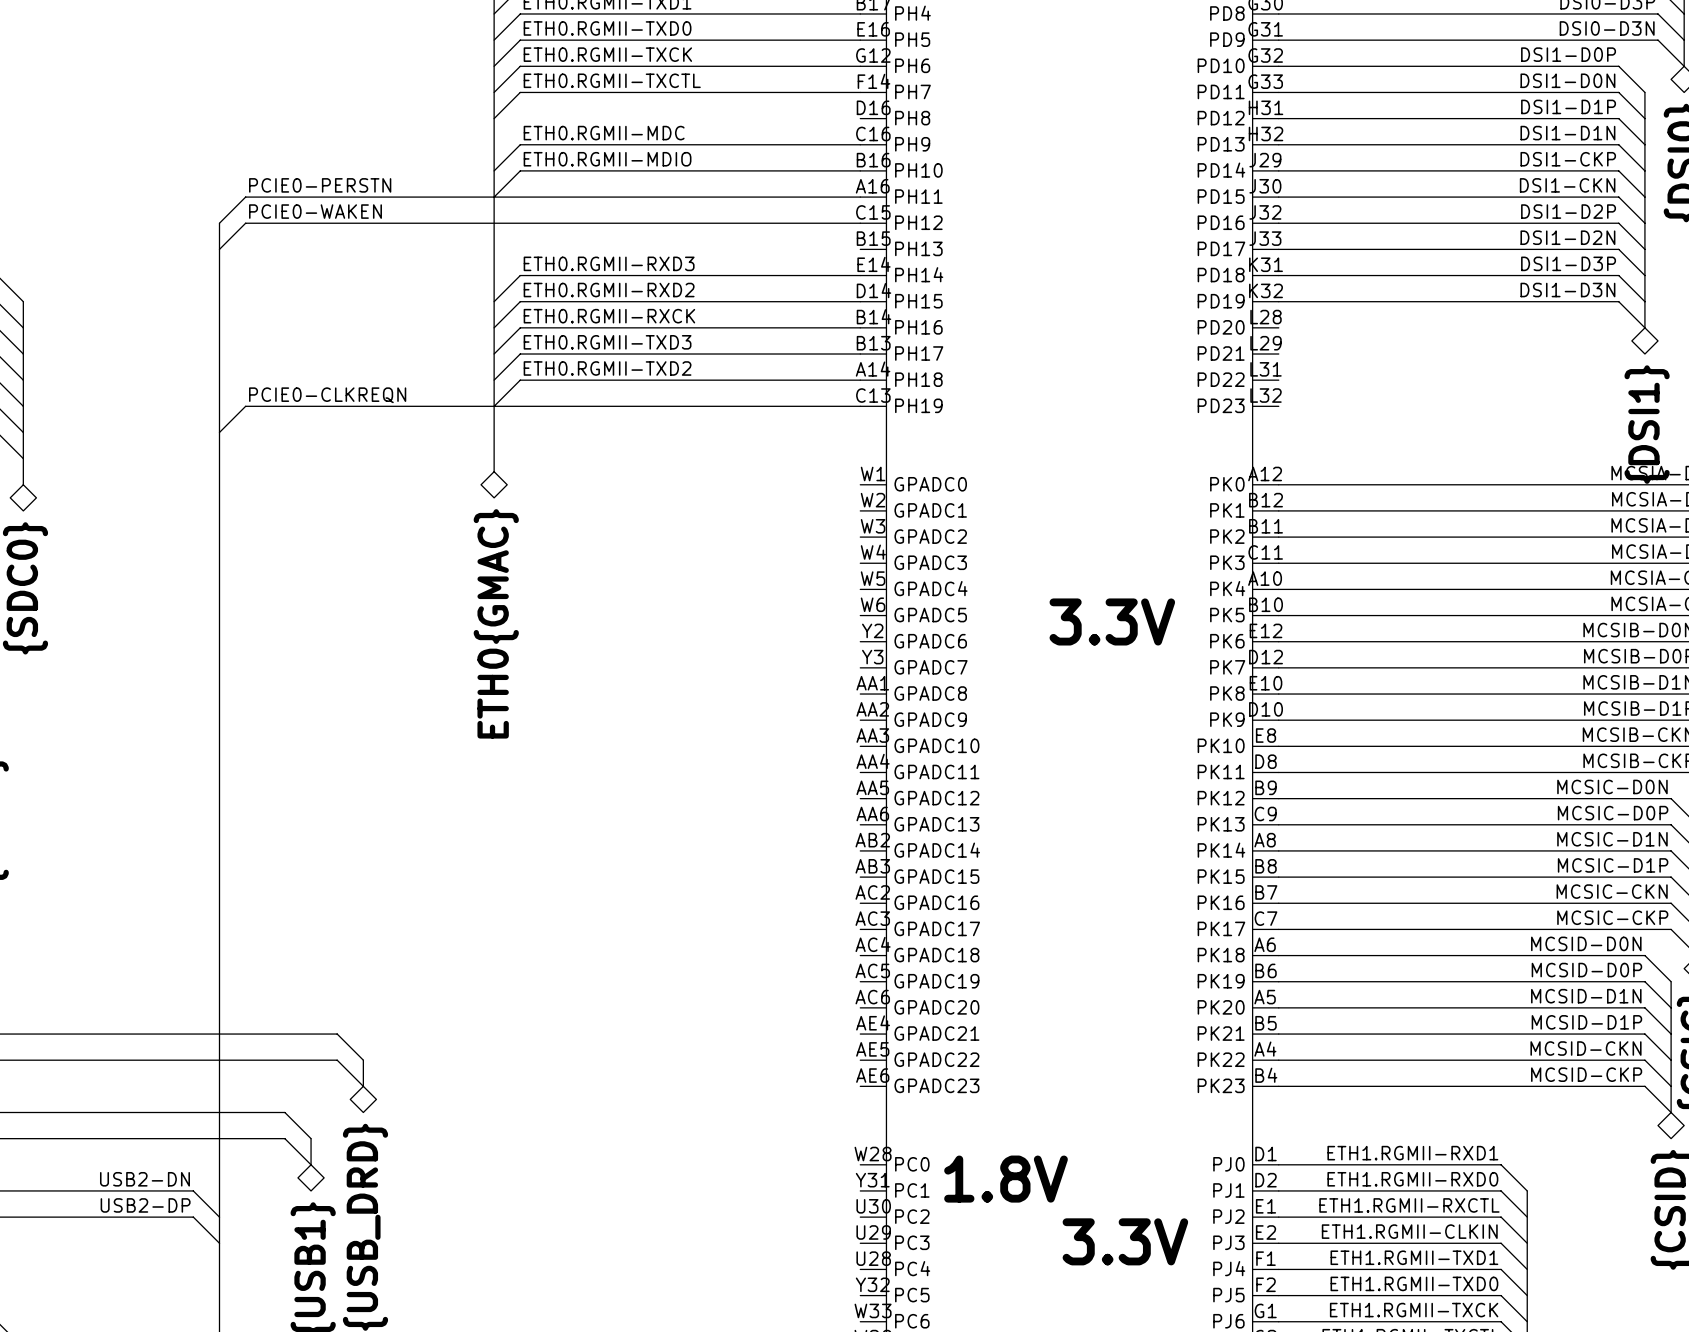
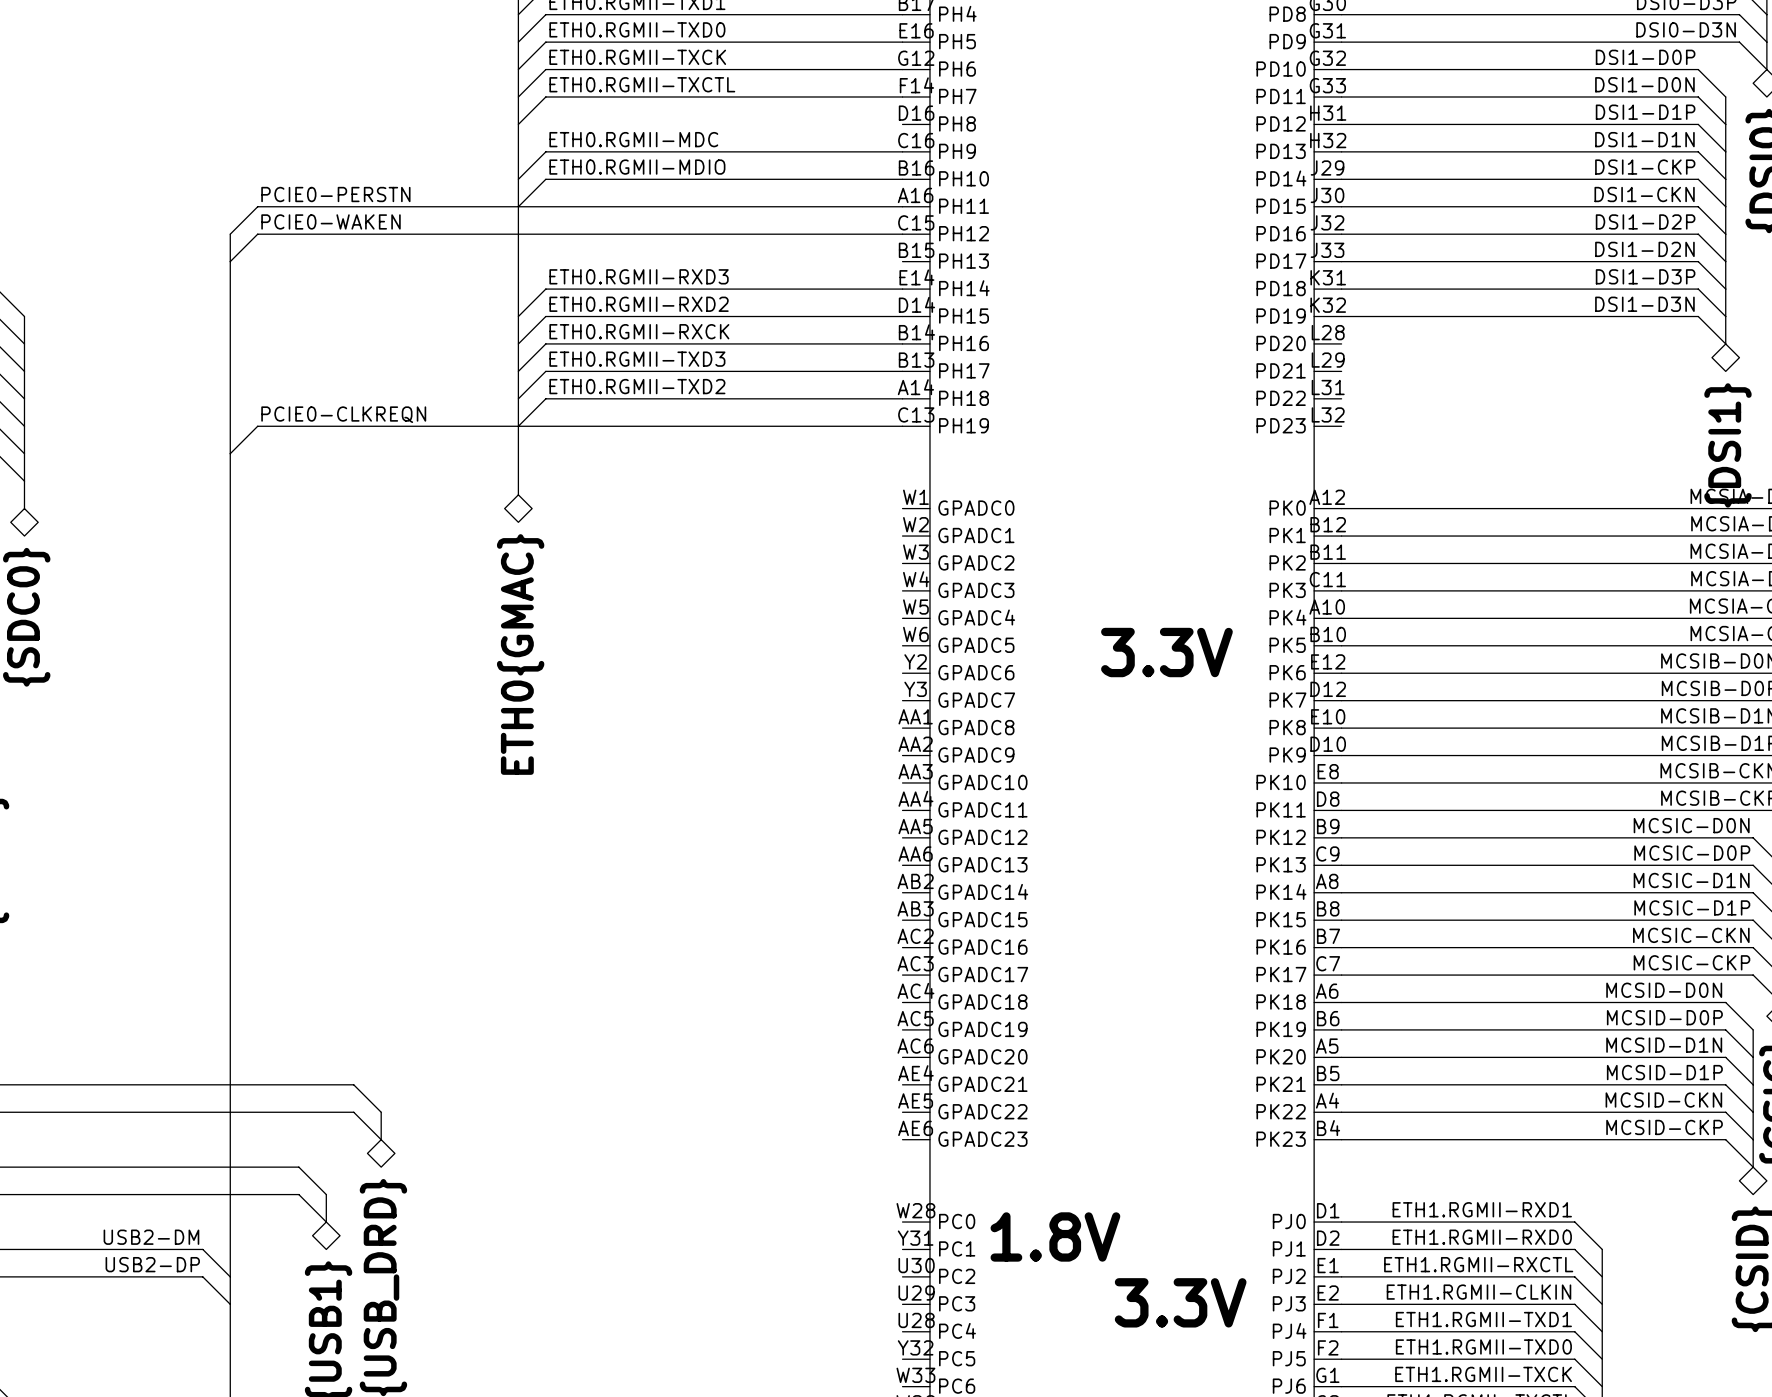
label: USB2-DN (144, 1179) -> USB2-DM (151, 1237)

